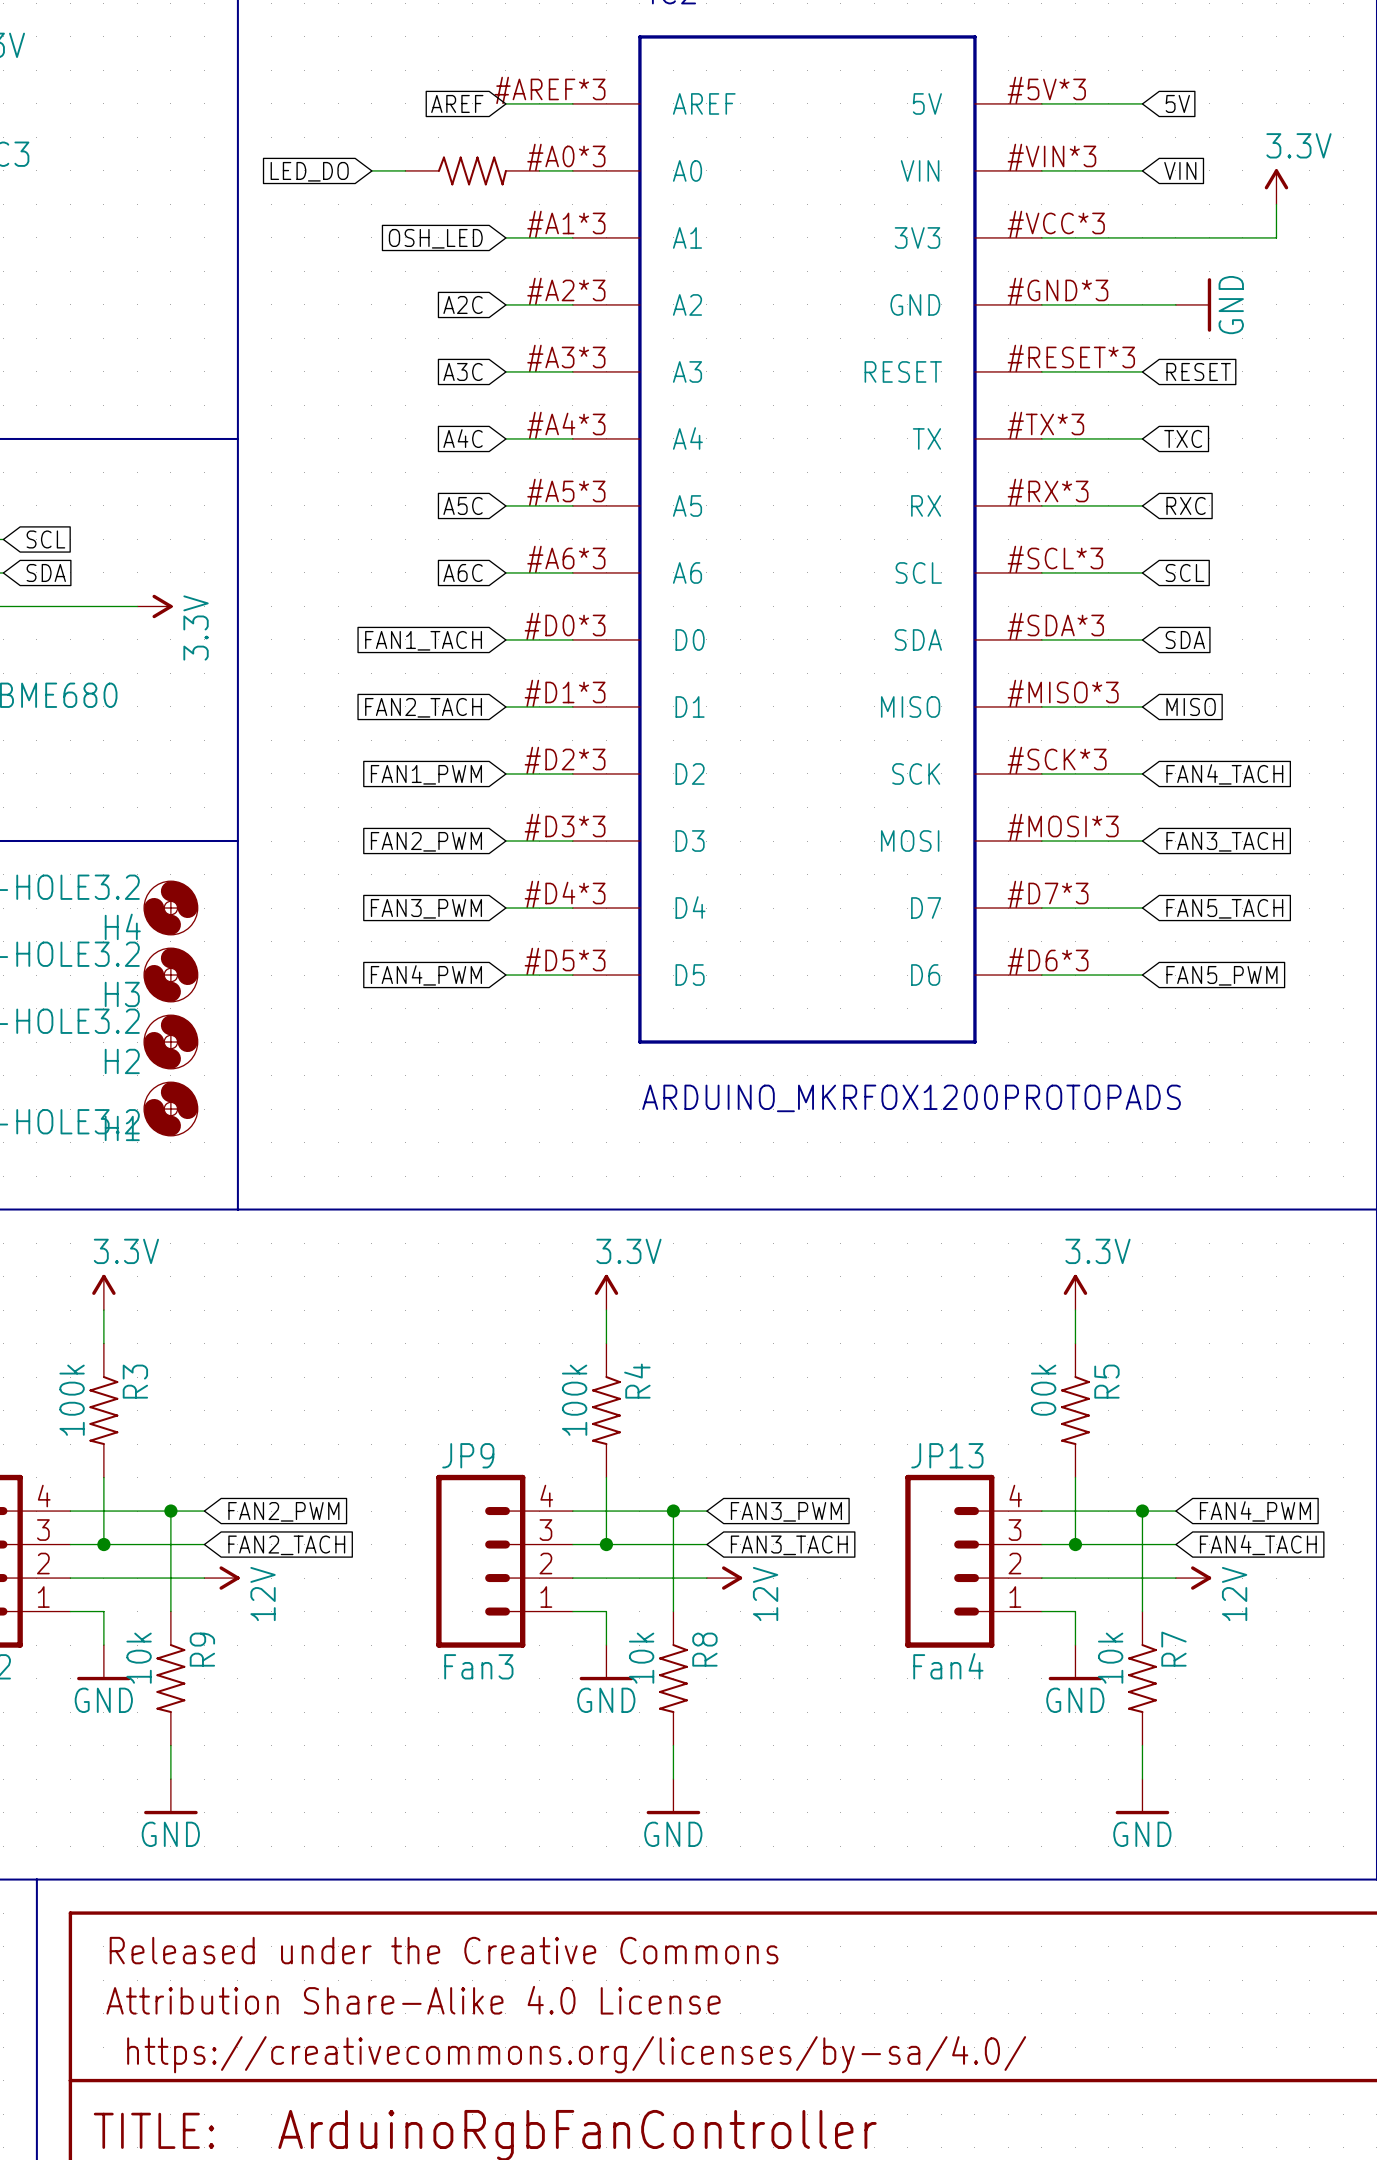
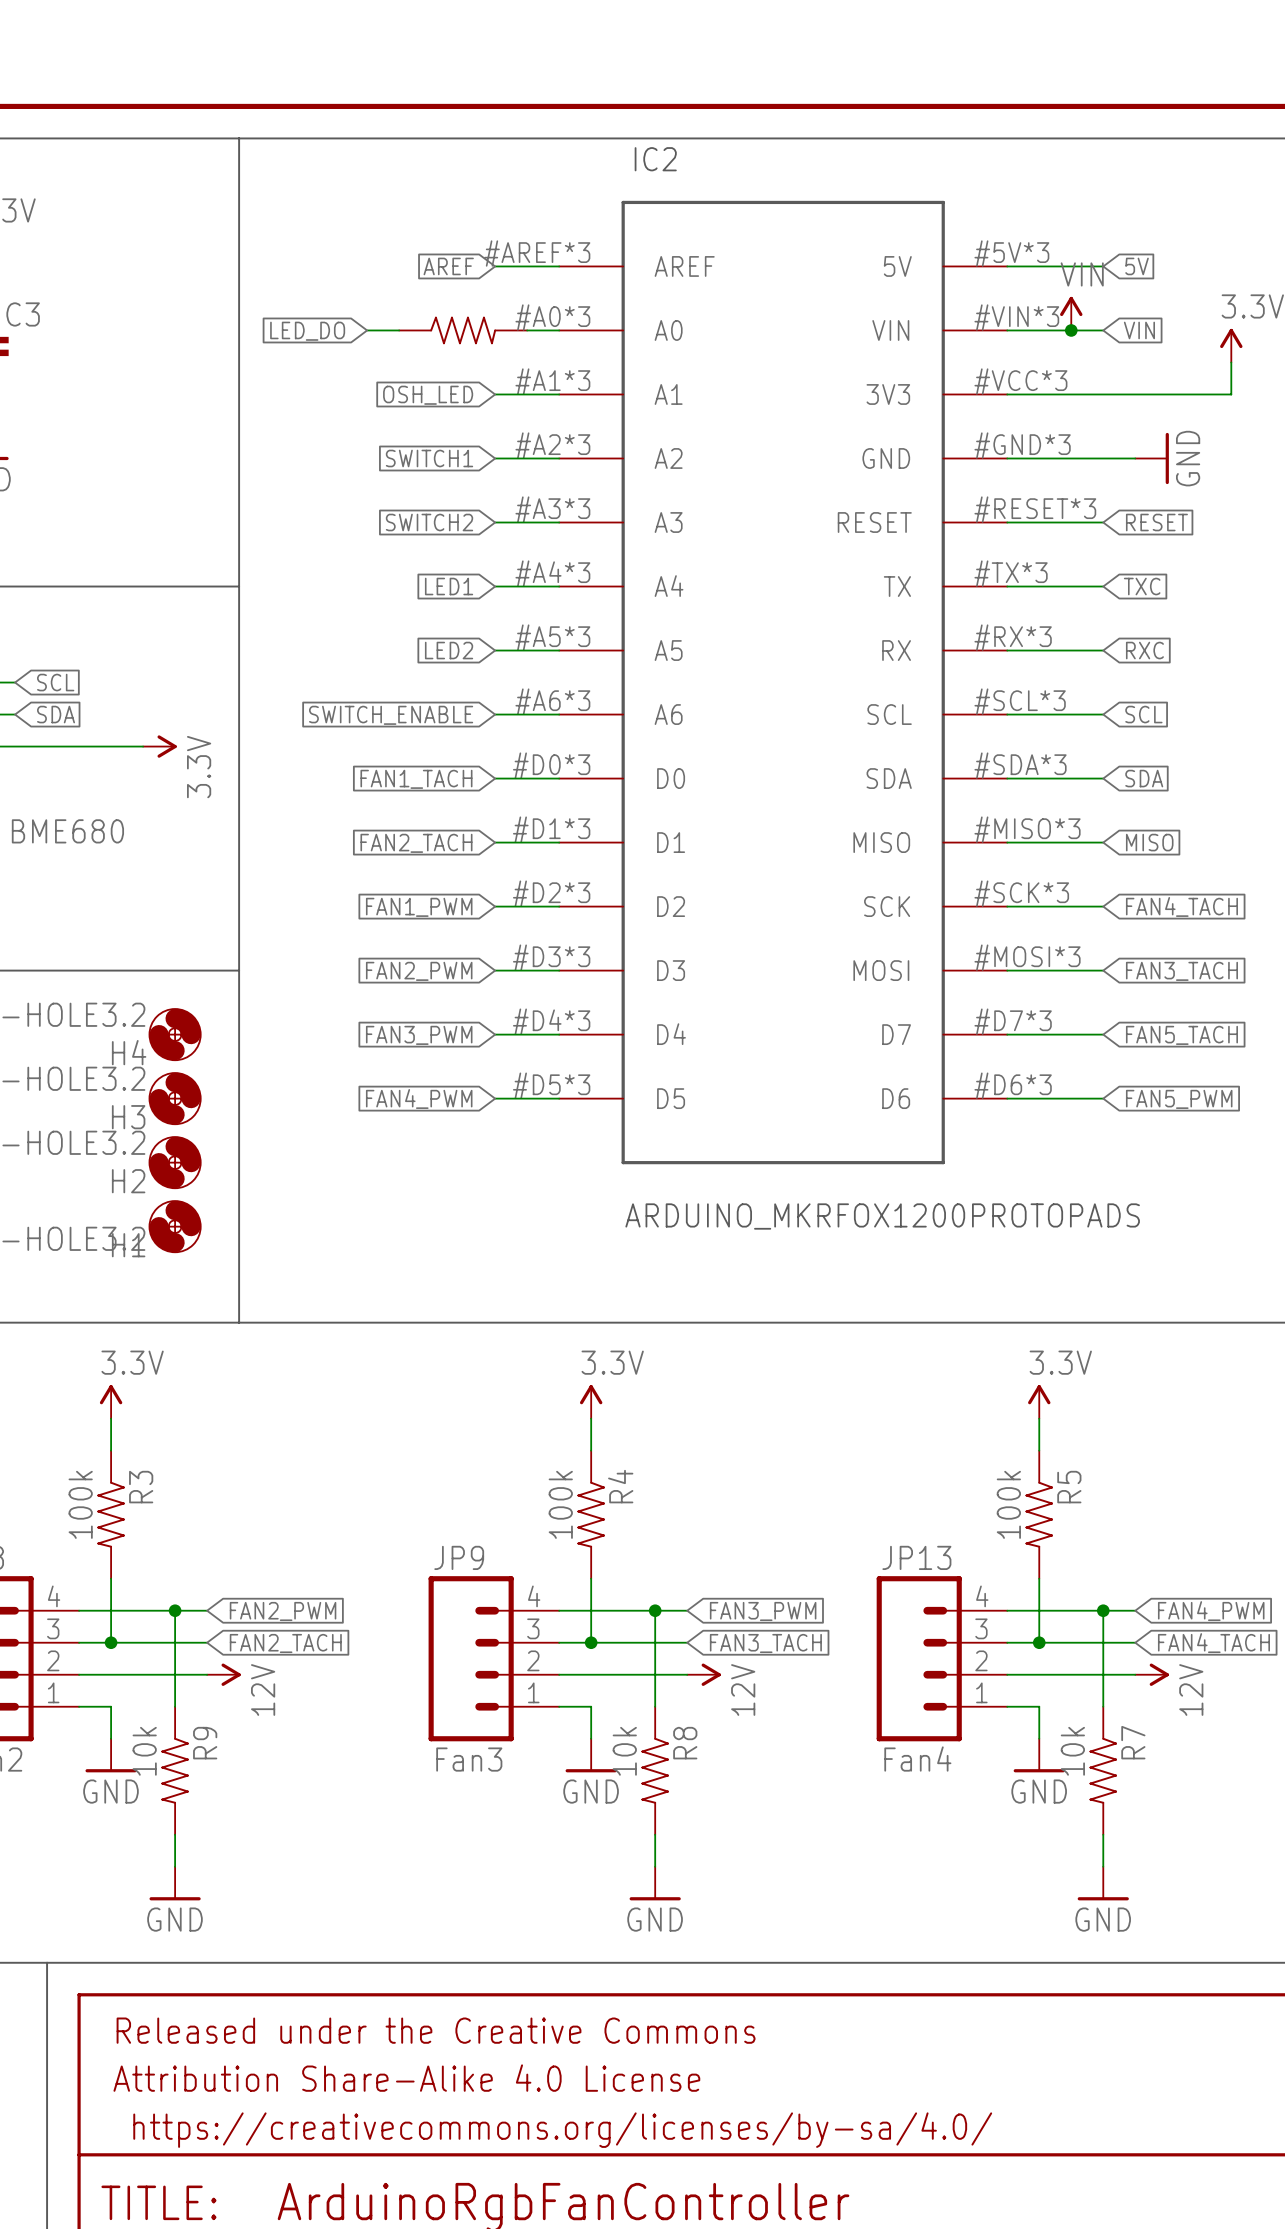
power symbol: none -> VIN (1071, 313)
junction: none -> (1071, 330)
global label: A2C (463, 304) -> SWITCH1 (429, 458)
global label: A3C (463, 371) -> SWITCH2 (429, 522)
global label: A4C (463, 438) -> LED1 (449, 586)
global label: A5C (463, 505) -> LED2 (449, 650)
global label: A6C (463, 572) -> SWITCH_ENABLE (391, 715)
R5 value: 00k (1043, 1390) -> 100k (1008, 1504)

